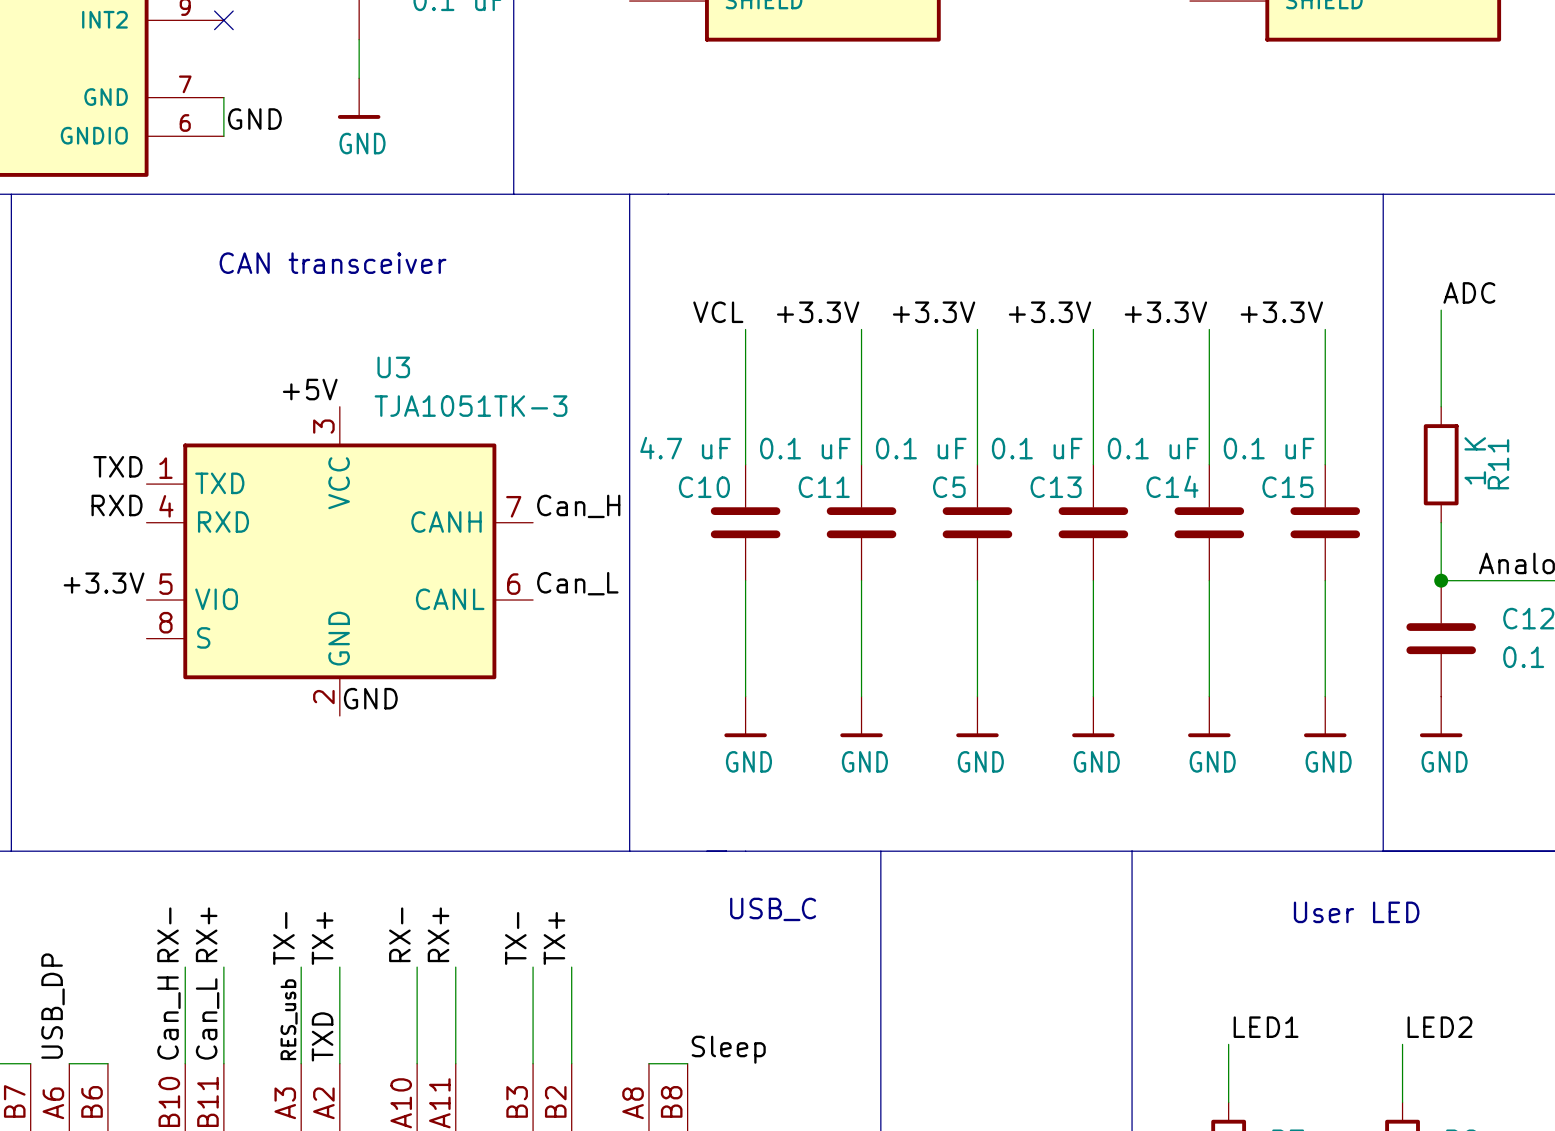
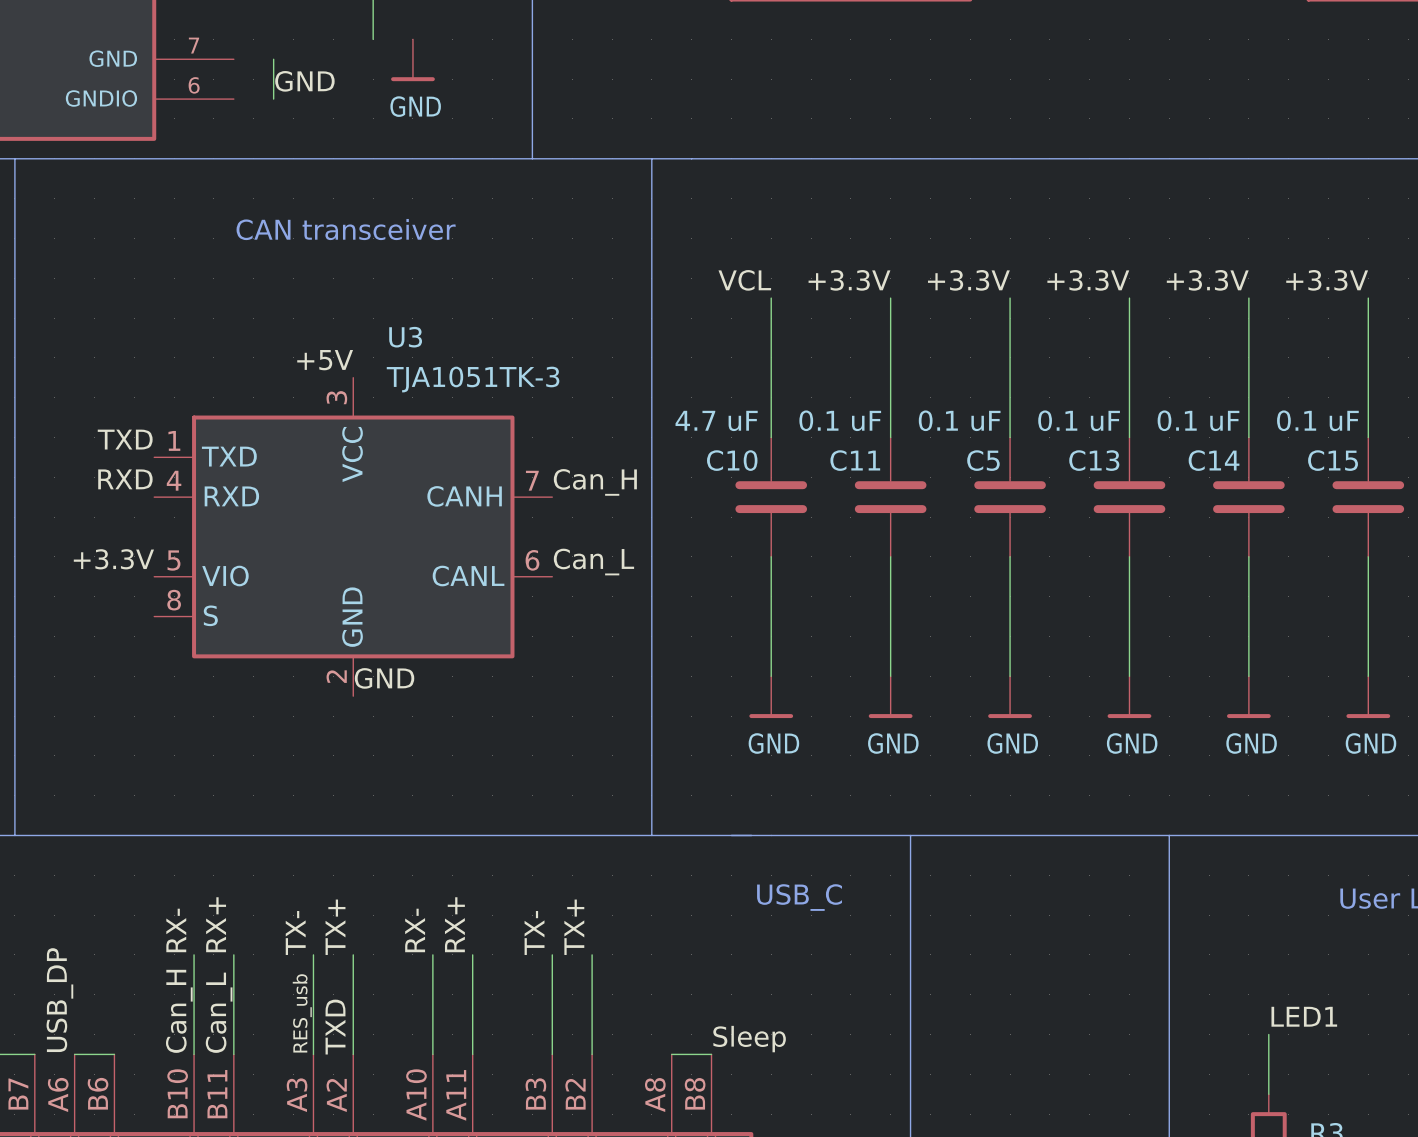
wire: (223, 97) (223, 136) -> (273, 59) (273, 99)
power symbol position: GND (359, 98) -> GND (412, 60)
label position: GND (254, 119) -> GND (304, 81)

